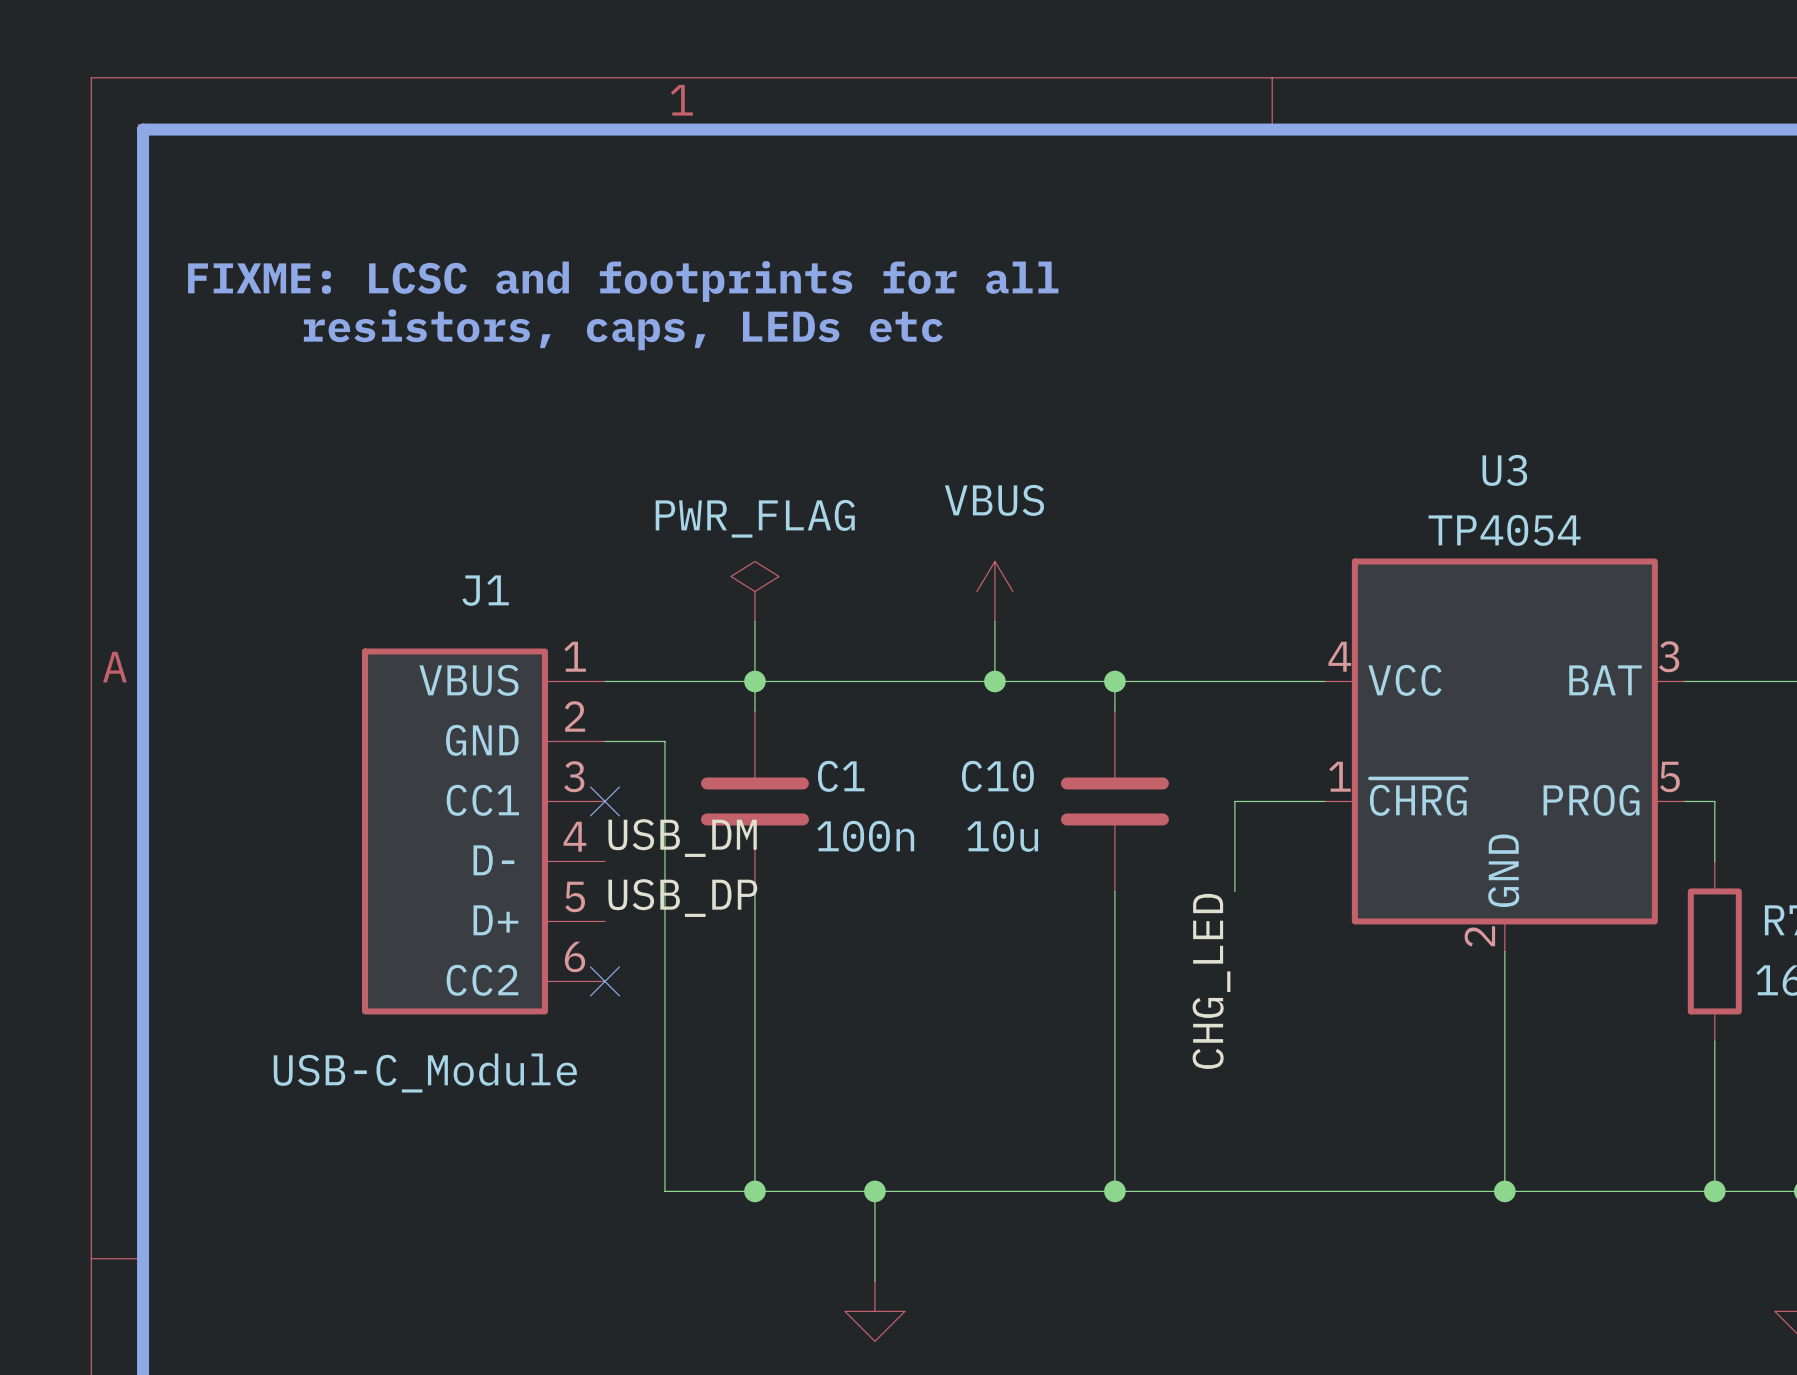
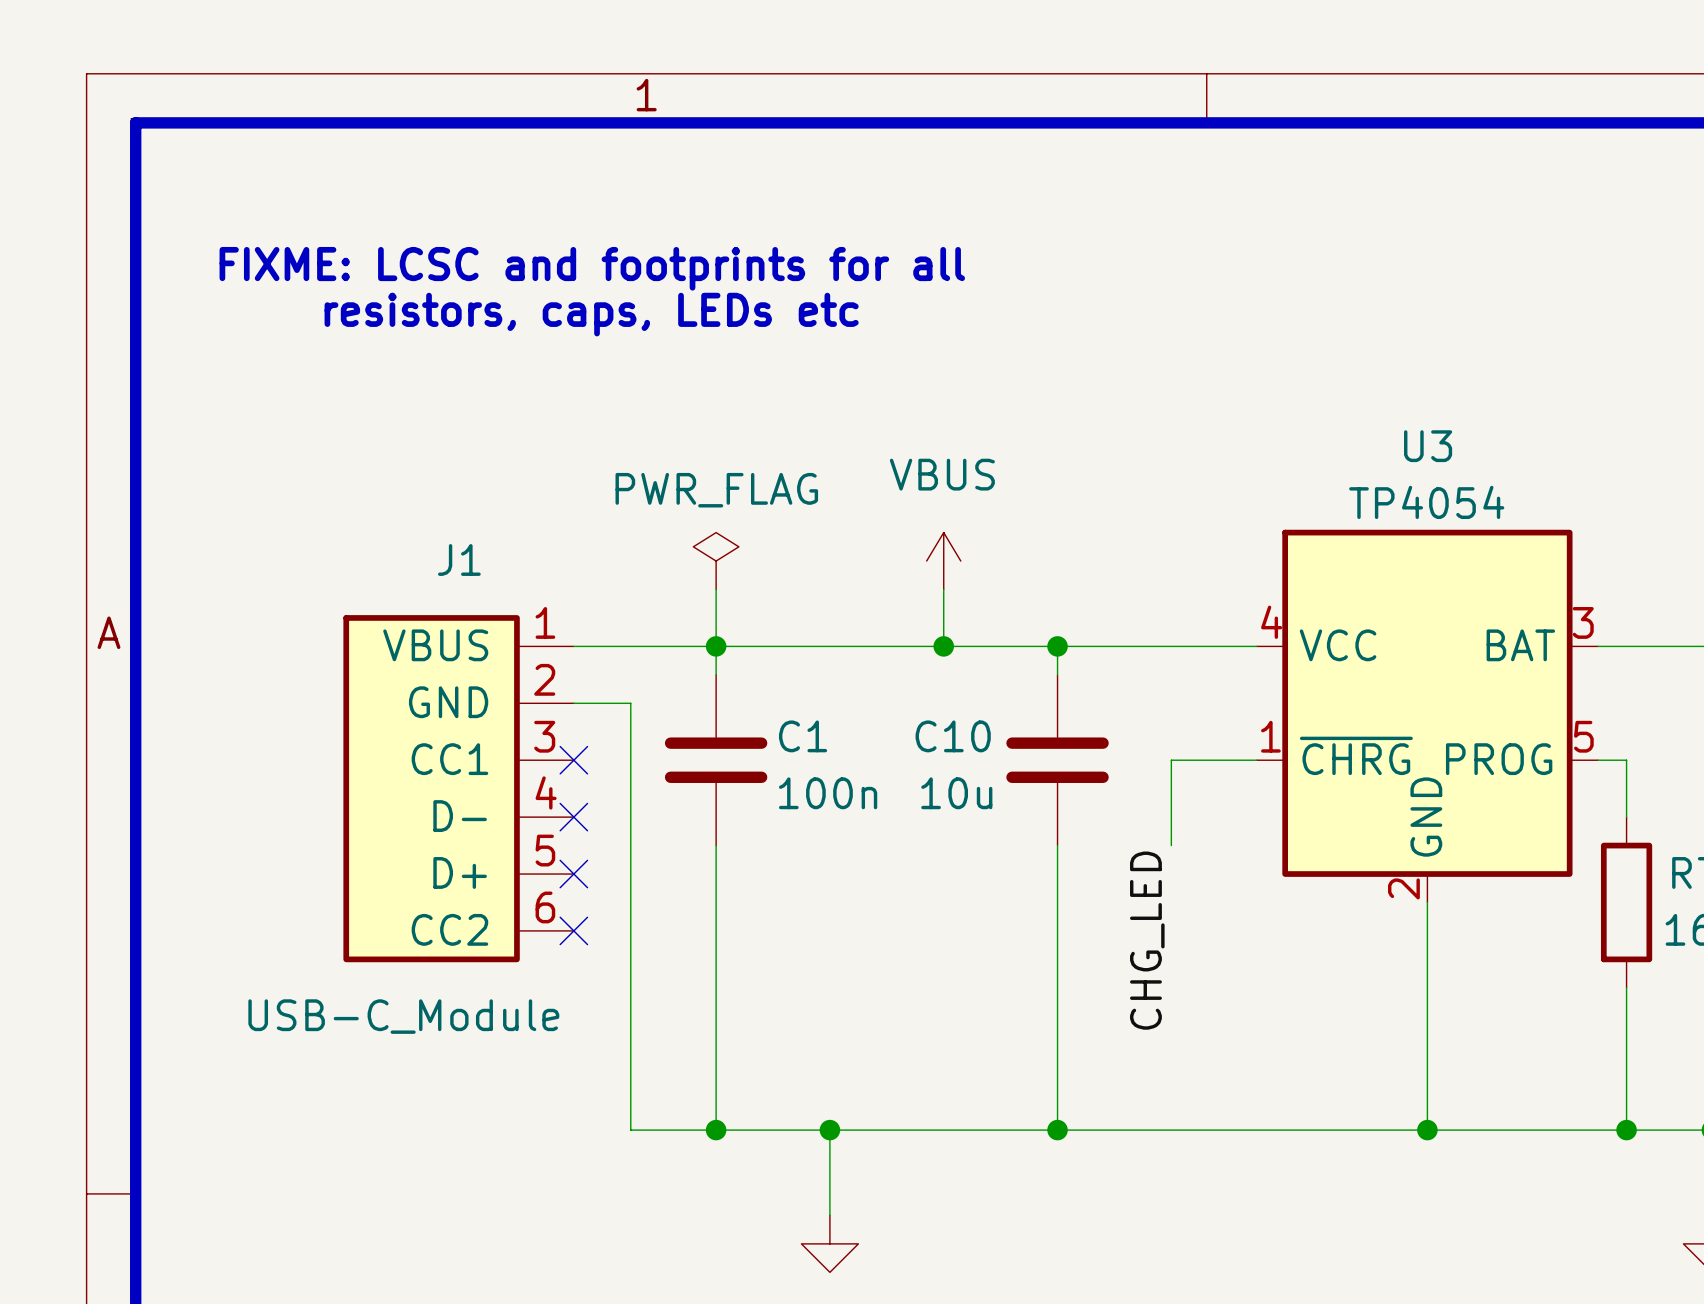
label: USB_DM (682, 838) -> none
no-connect mark: none -> (573, 817)
label: USB_DP (682, 898) -> none
no-connect mark: none -> (573, 874)

